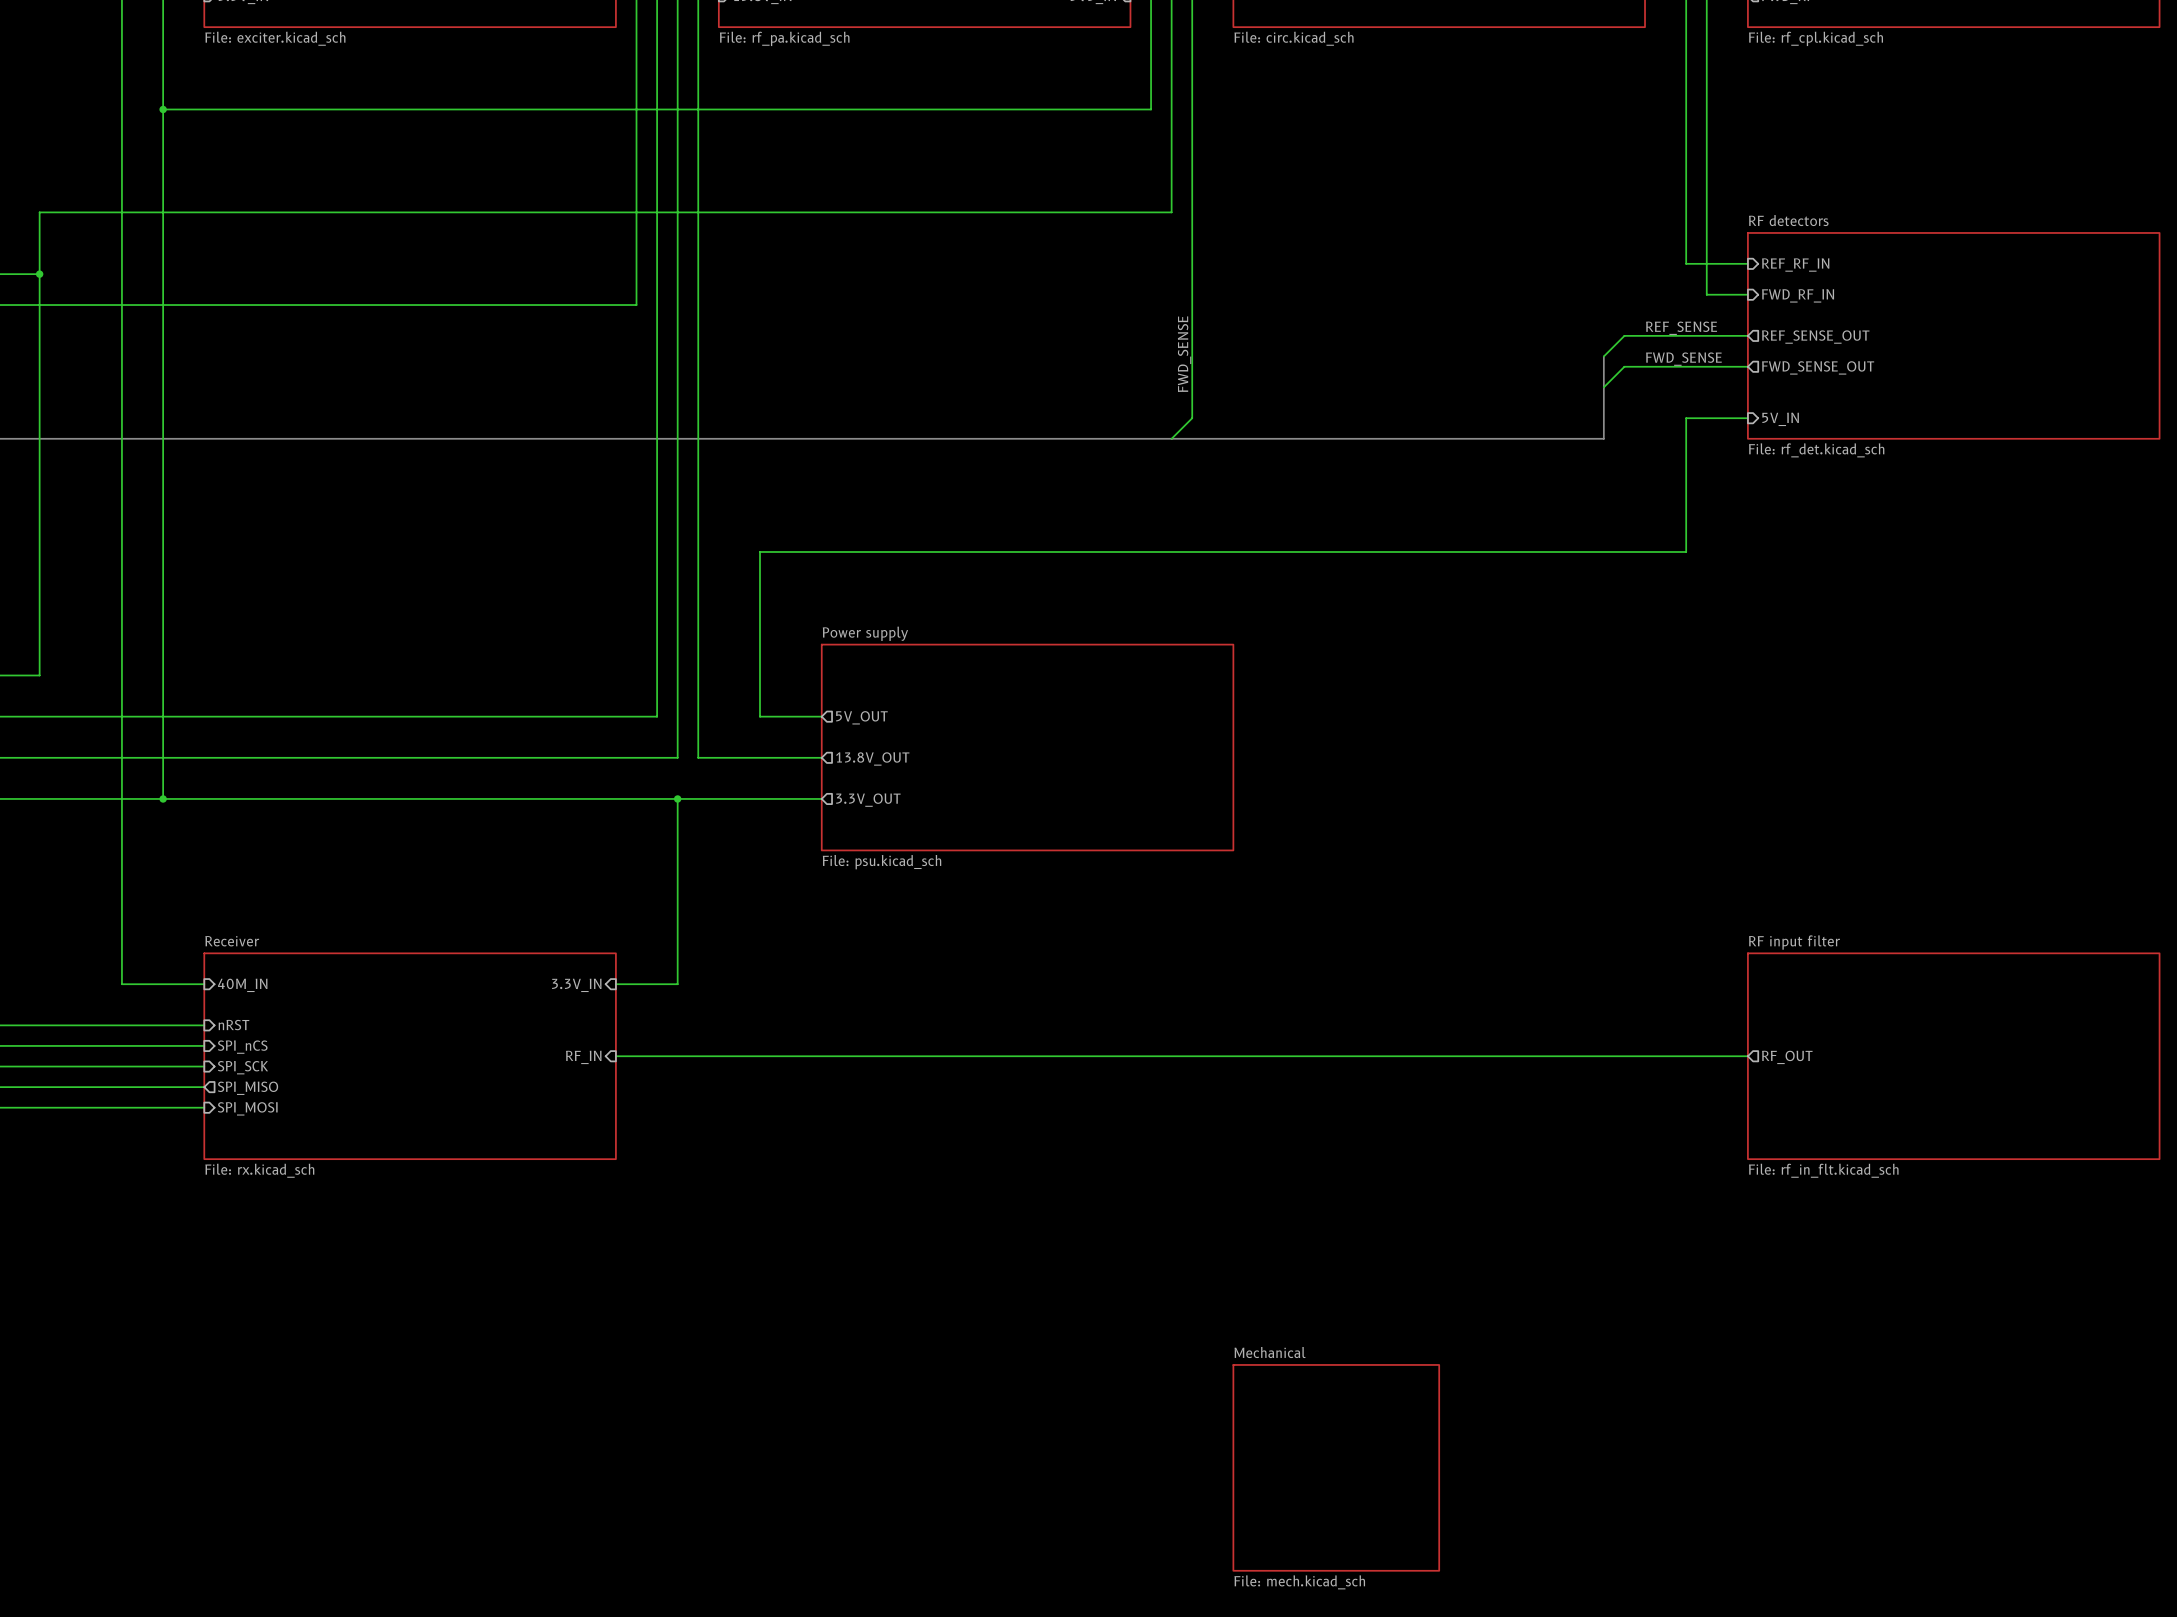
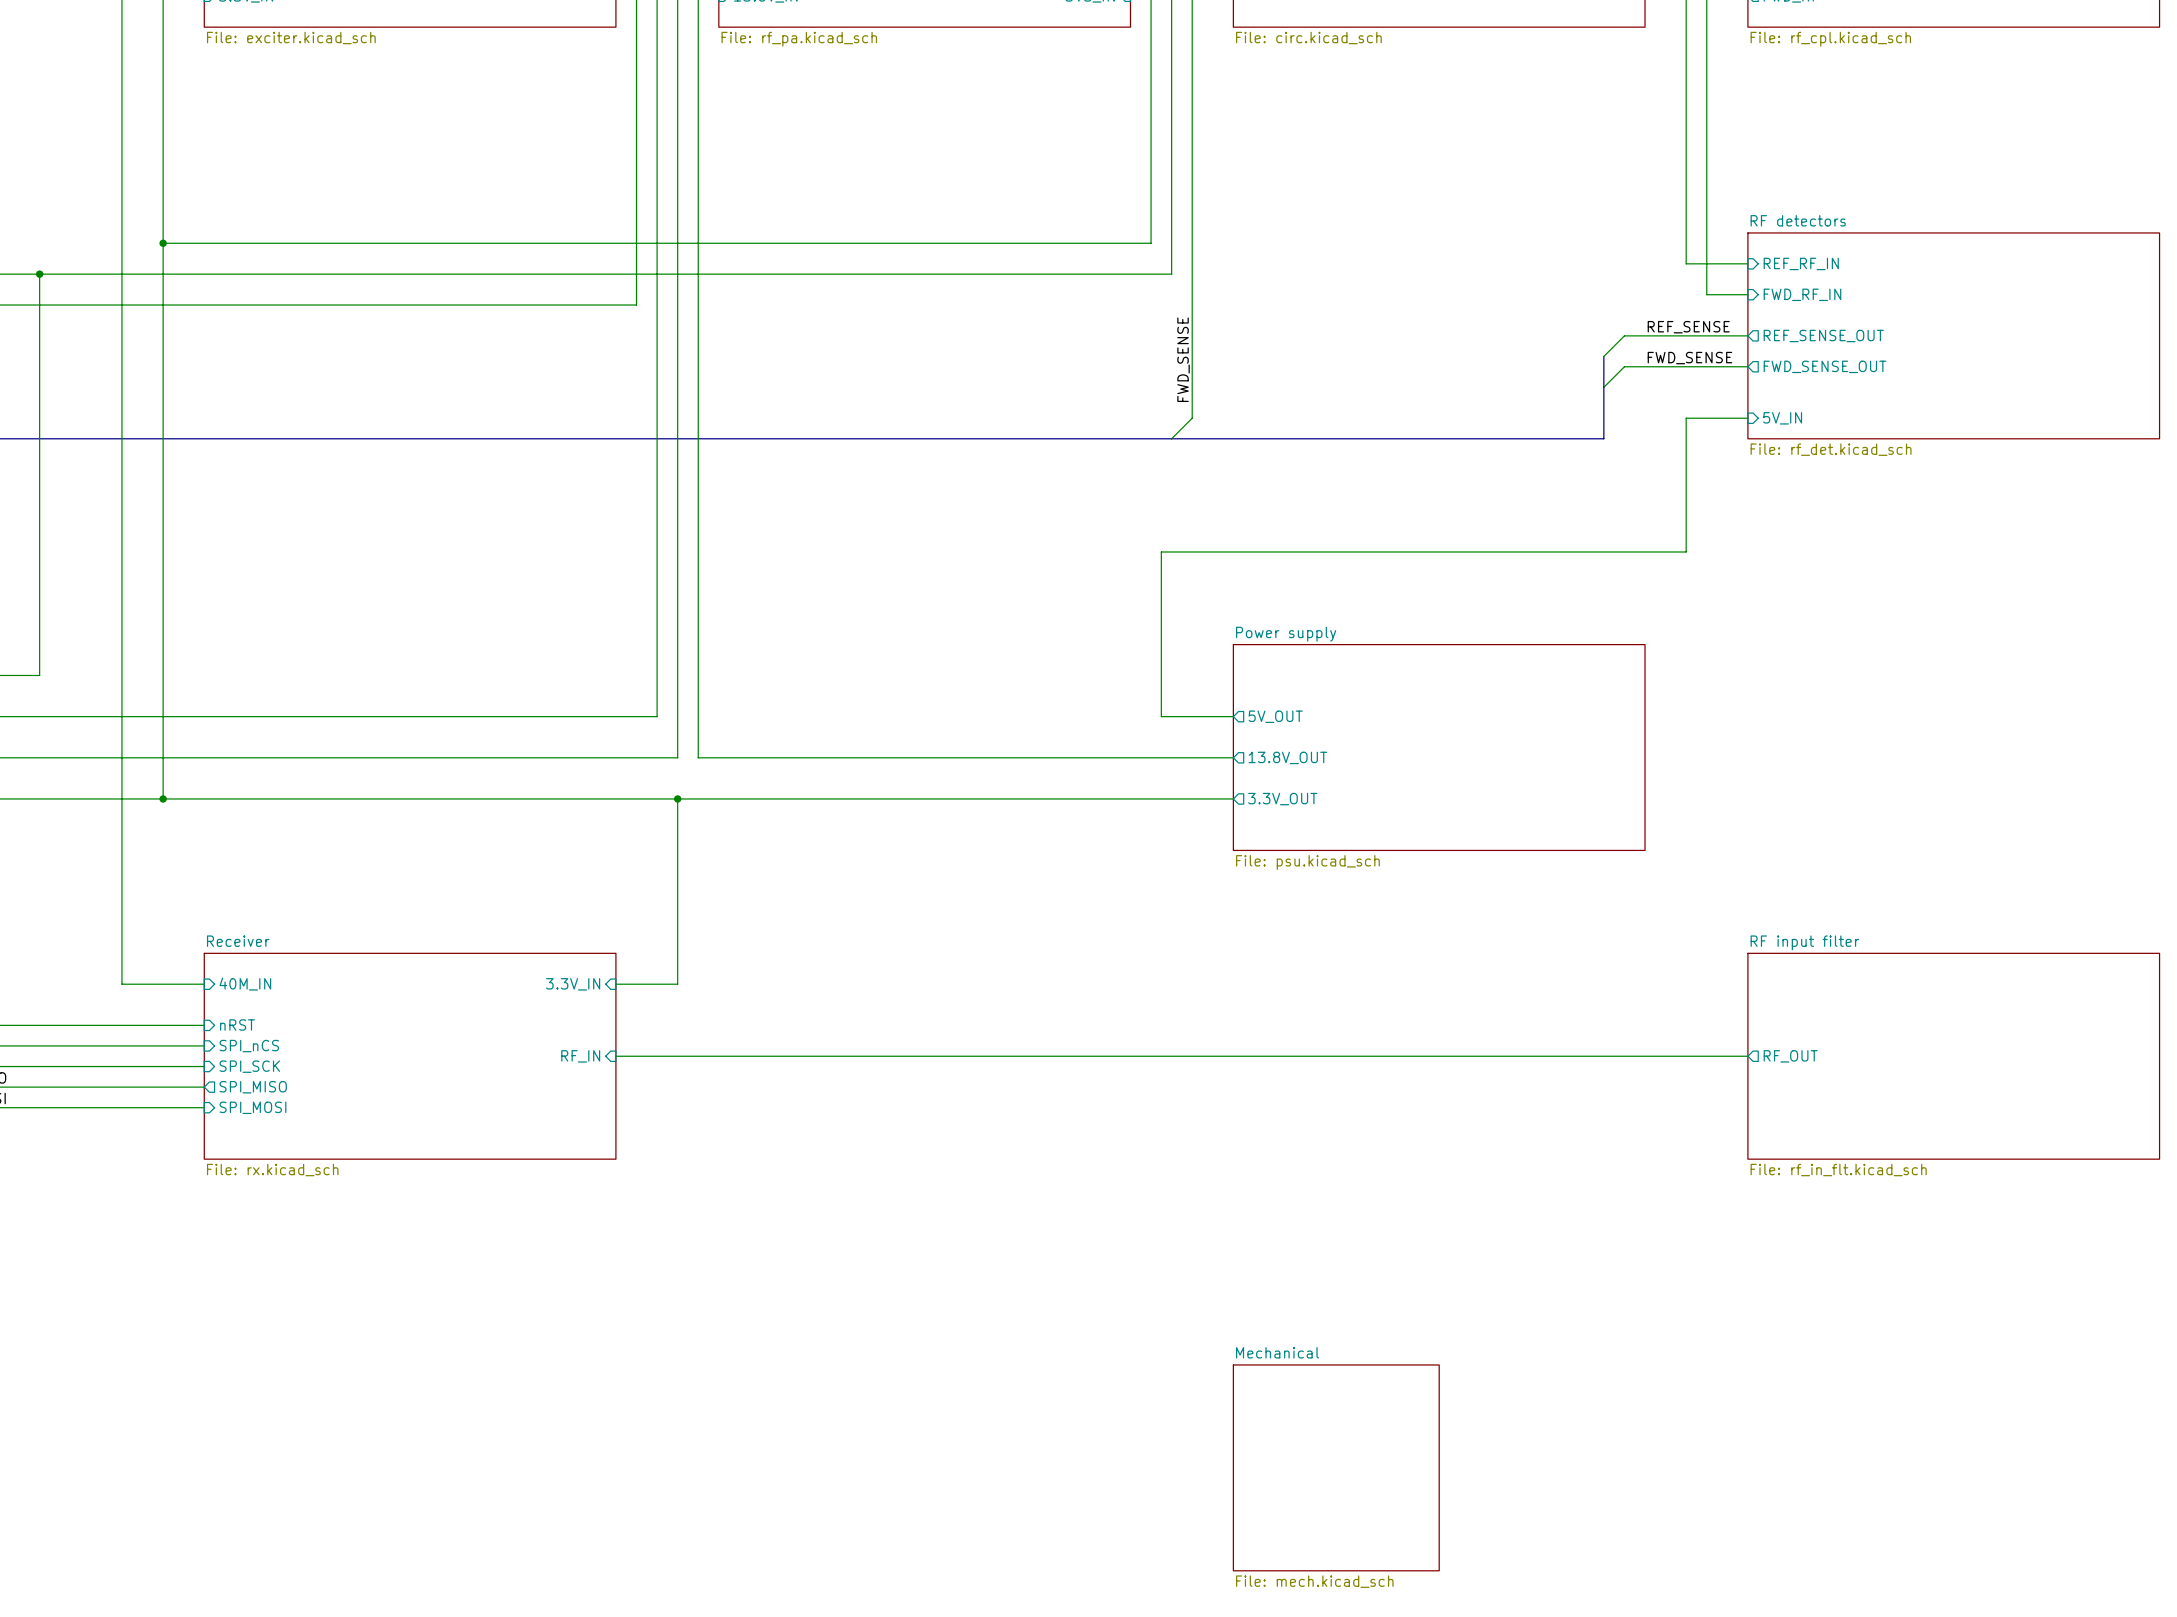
wire: (163, 109) (1151, 109) -> (163, 243) (1151, 243) (1151, 109)
junction: (163, 109) -> none
wire: (1171, 212) (39, 212) (39, 274) -> (1171, 212) (1171, 274) (39, 274)
junction: none -> (163, 243)
wire: (1161, 551) (760, 551) (760, 716) (821, 716) -> (1161, 551) (1161, 716) (1233, 716)
sheet pin: 5V_OUT (861, 717) -> none
sheet pin: none -> 5V_OUT (1275, 716)
sheet Power supply: File: psu.kicad_sch (1027, 747) -> none
sheet Power supply: none -> File: psu.kicad_sch (1439, 747)
wire: none -> (821, 757) (1233, 757)
sheet pin: 13.8V_OUT (872, 758) -> none
sheet pin: none -> 13.8V_OUT (1287, 757)
wire: none -> (821, 798) (1233, 798)
sheet pin: 3.3V_OUT (868, 800) -> none
sheet pin: none -> 3.3V_OUT (1282, 799)

